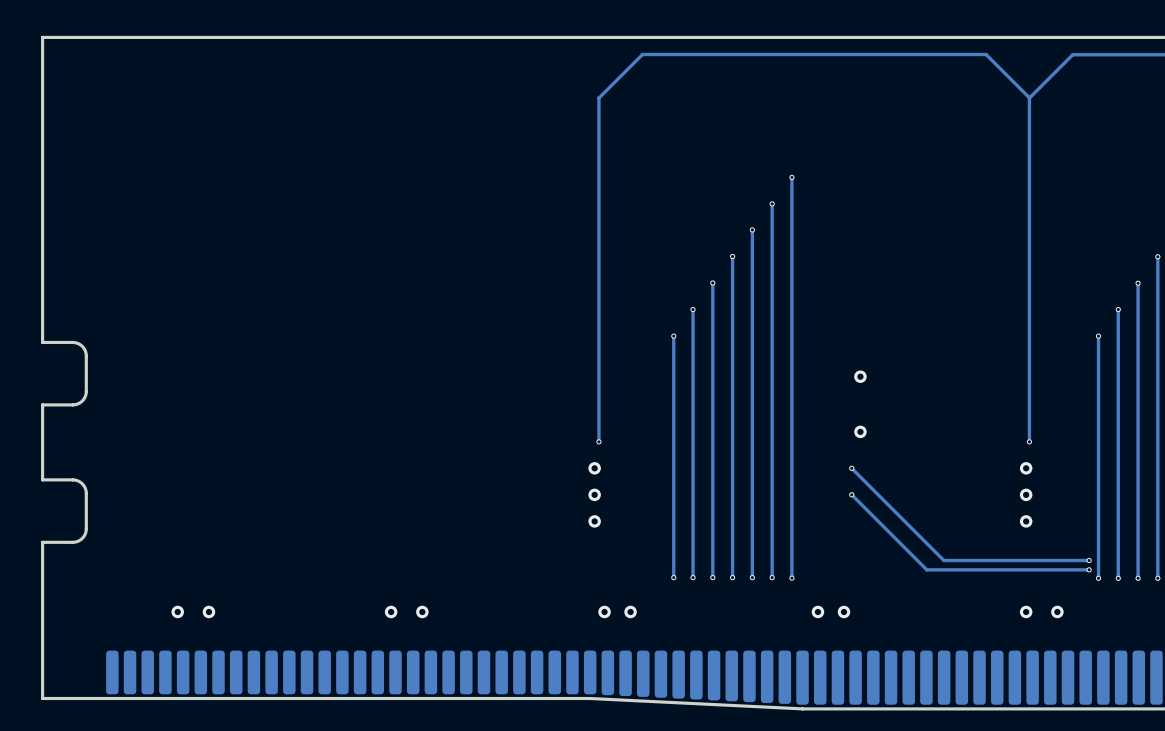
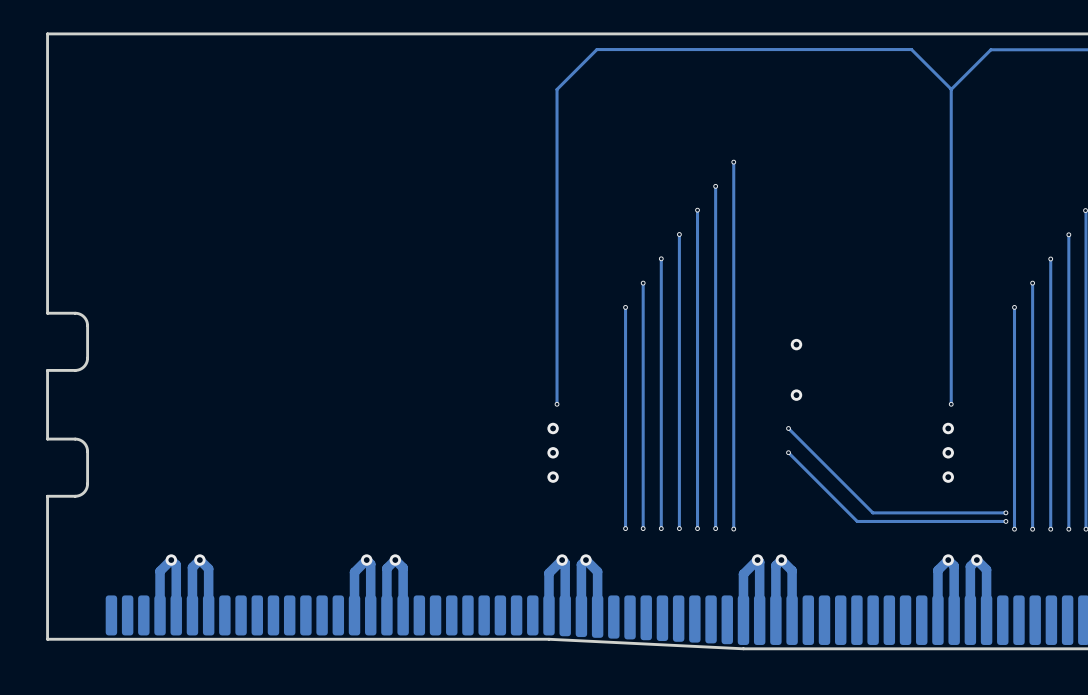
track: none -> (176, 615) (176, 565) (171, 560) (160, 571) (160, 615)
track: none -> (208, 615) (208, 568) (199, 560) (192, 567) (192, 615)
track: none -> (370, 615) (370, 564) (366, 560) (354, 572) (354, 615)
track: none -> (403, 615) (403, 567) (395, 560) (386, 568) (386, 615)
track: none -> (548, 615) (548, 573) (562, 560) (565, 563) (565, 620)
track: none -> (597, 620) (597, 571) (585, 560) (581, 564) (581, 620)
track: none -> (759, 620) (759, 562) (757, 560) (743, 574) (743, 620)
track: none -> (792, 620) (792, 570) (781, 560) (775, 565) (775, 620)
track: none -> (954, 620) (954, 565) (948, 560) (937, 570) (937, 620)
track: none -> (986, 620) (986, 569) (976, 560) (970, 566) (970, 620)

